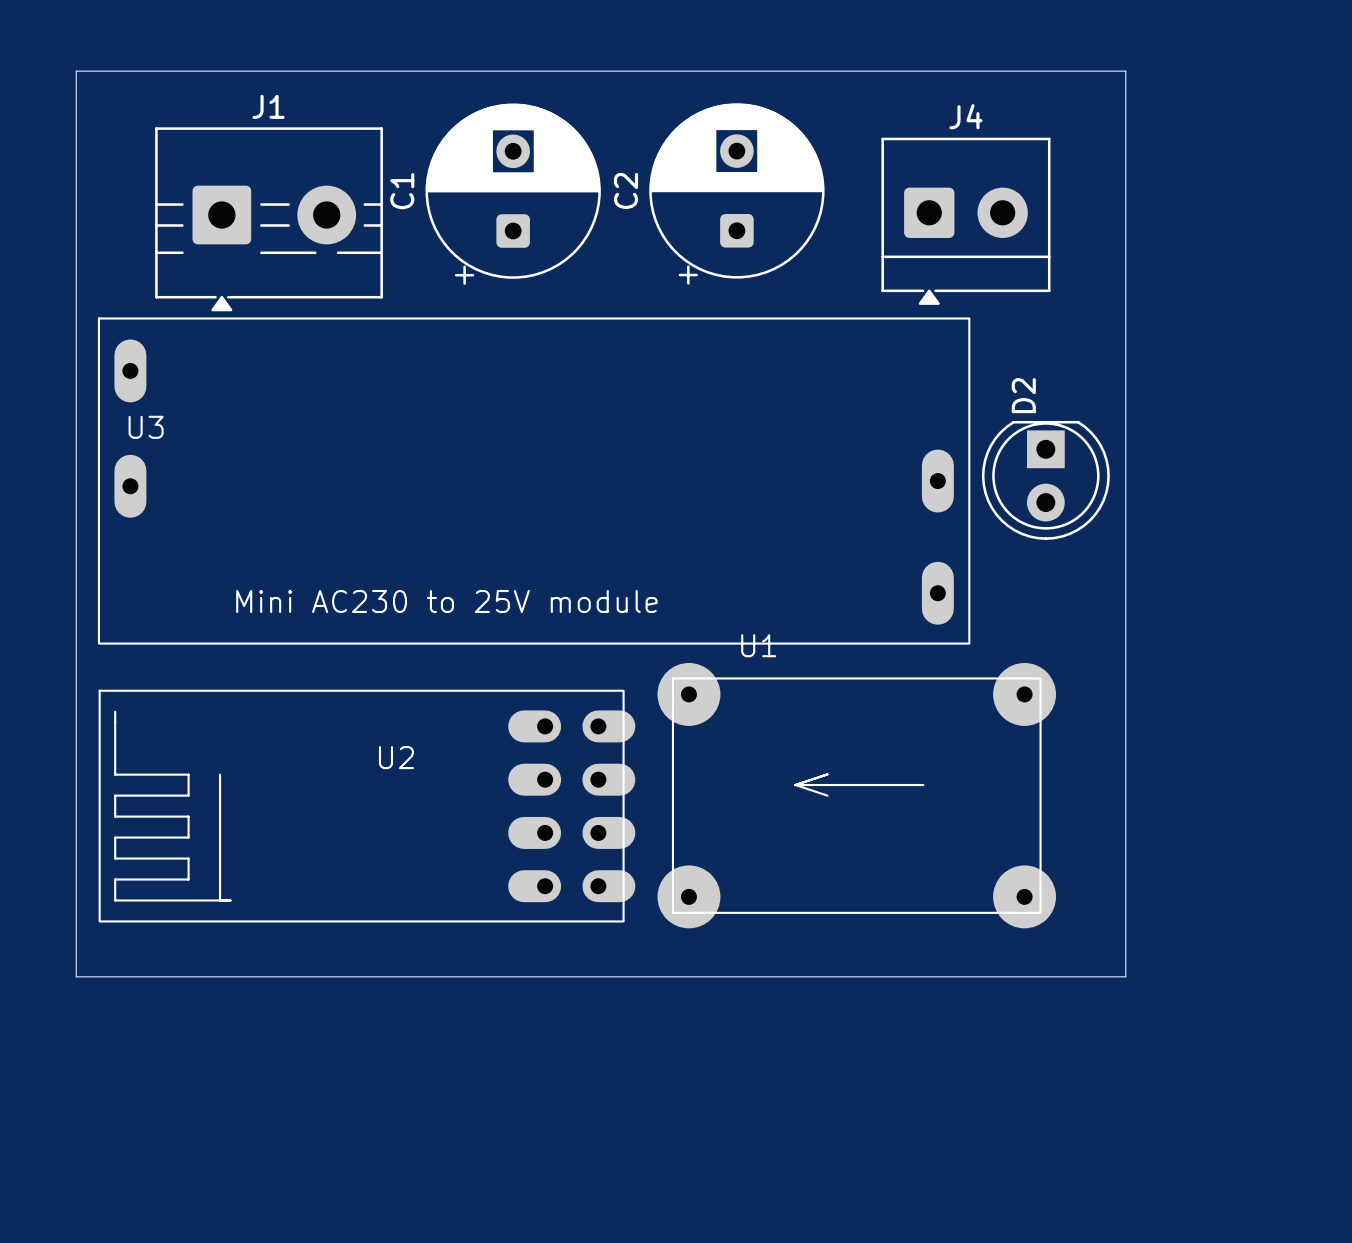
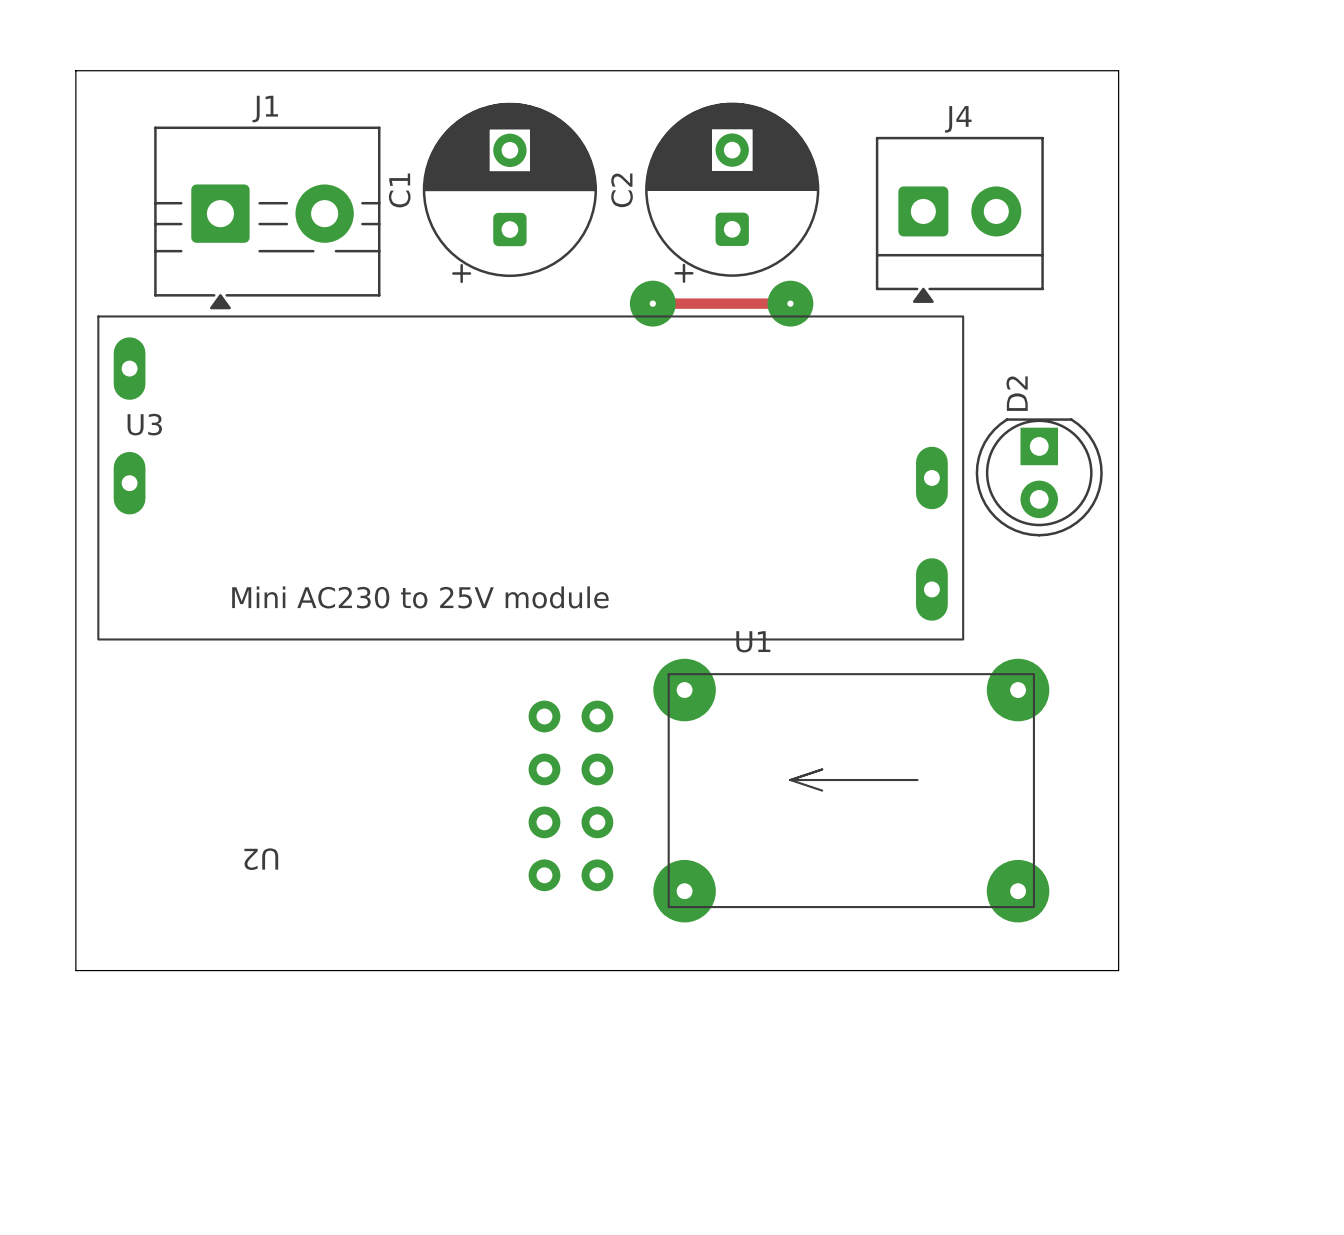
track: none -> (652, 303) (790, 303)
via: none -> (652, 303)
via: none -> (790, 303)
U2 footprint: [98, 689, 636, 923] -> [528, 700, 614, 892]
U2 name position: U2 (396, 757) -> U2 (261, 859)

